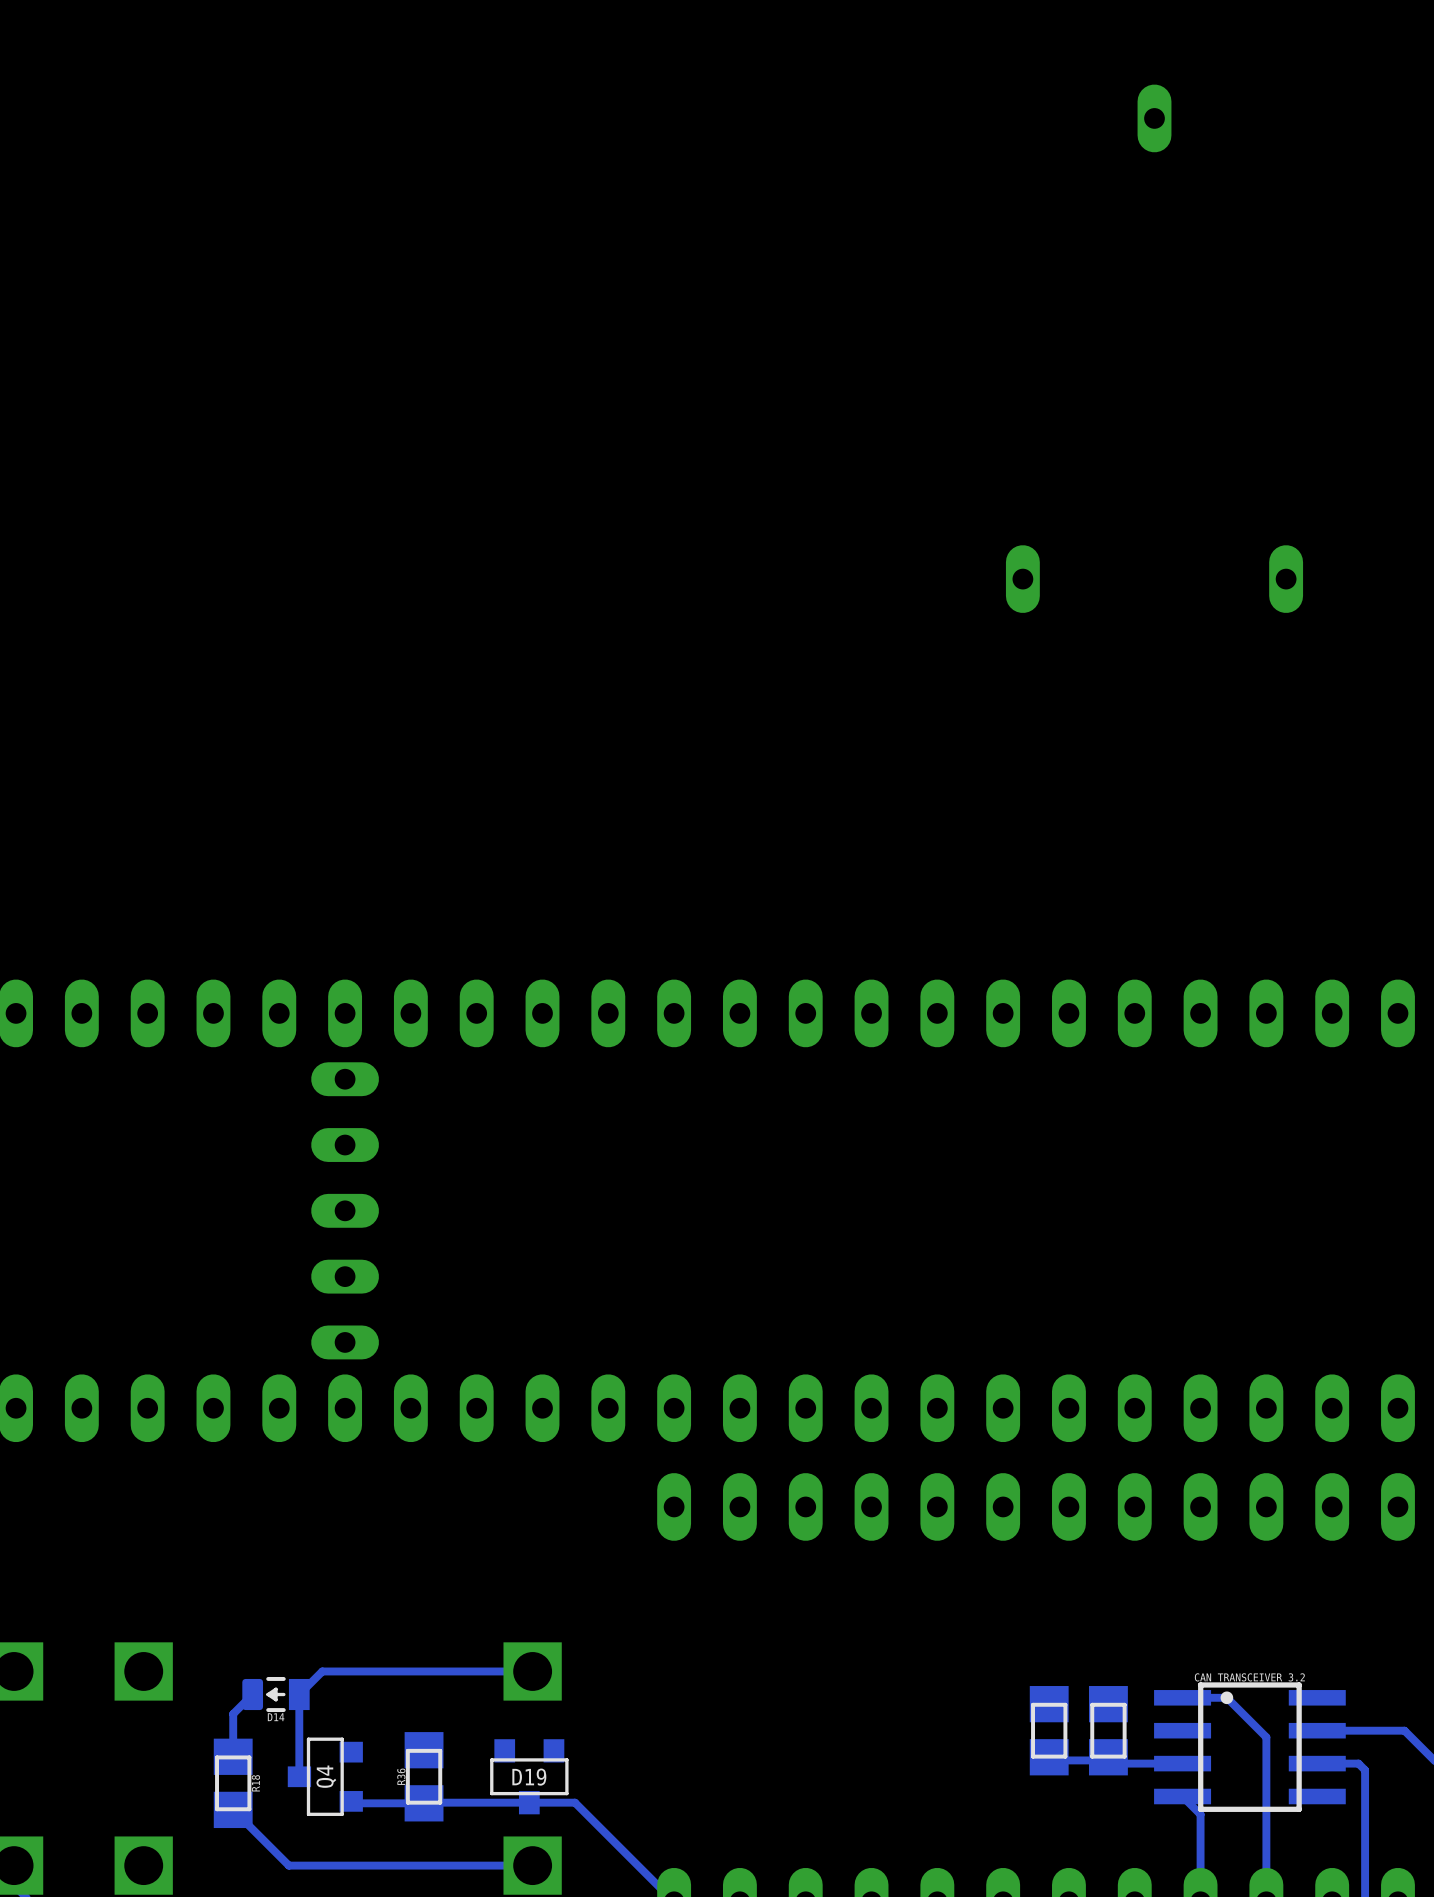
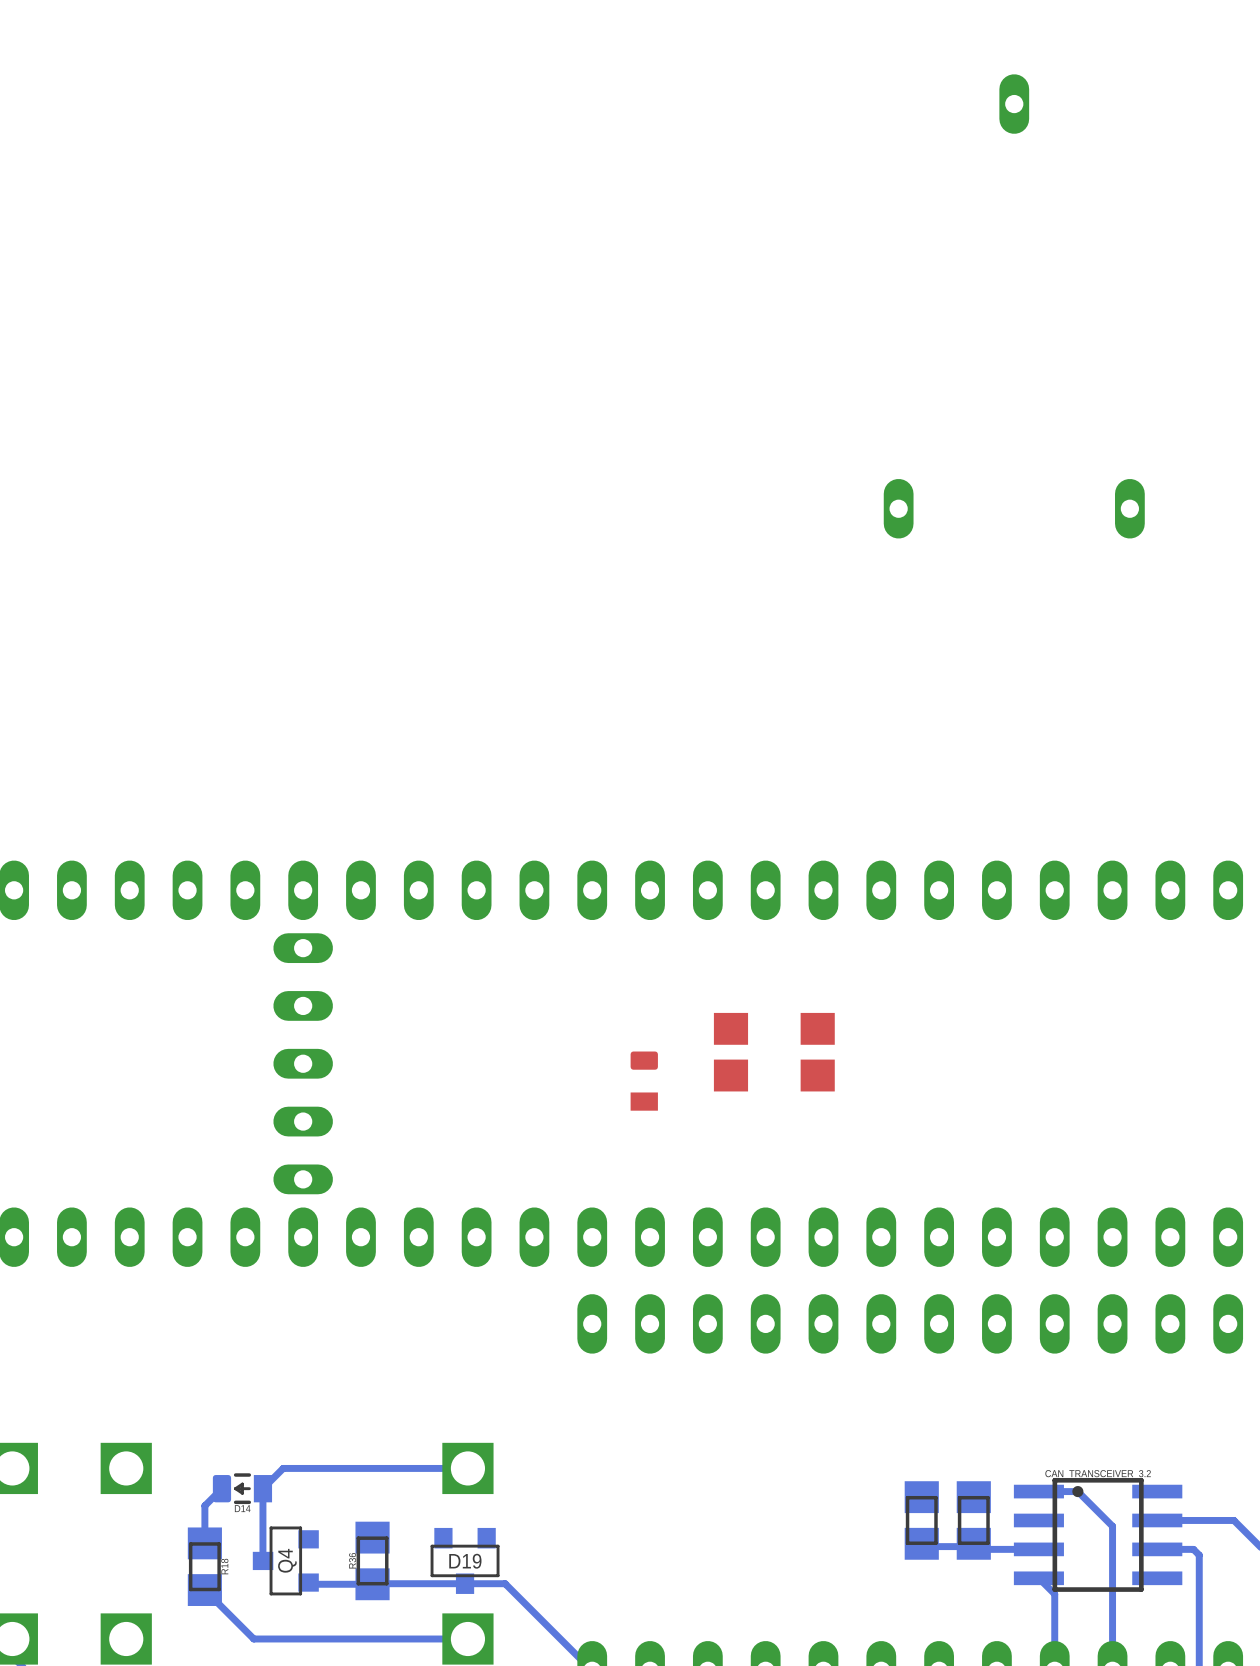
part: none -> (730, 1052)
part: none -> (817, 1052)
part: none -> (644, 1081)

